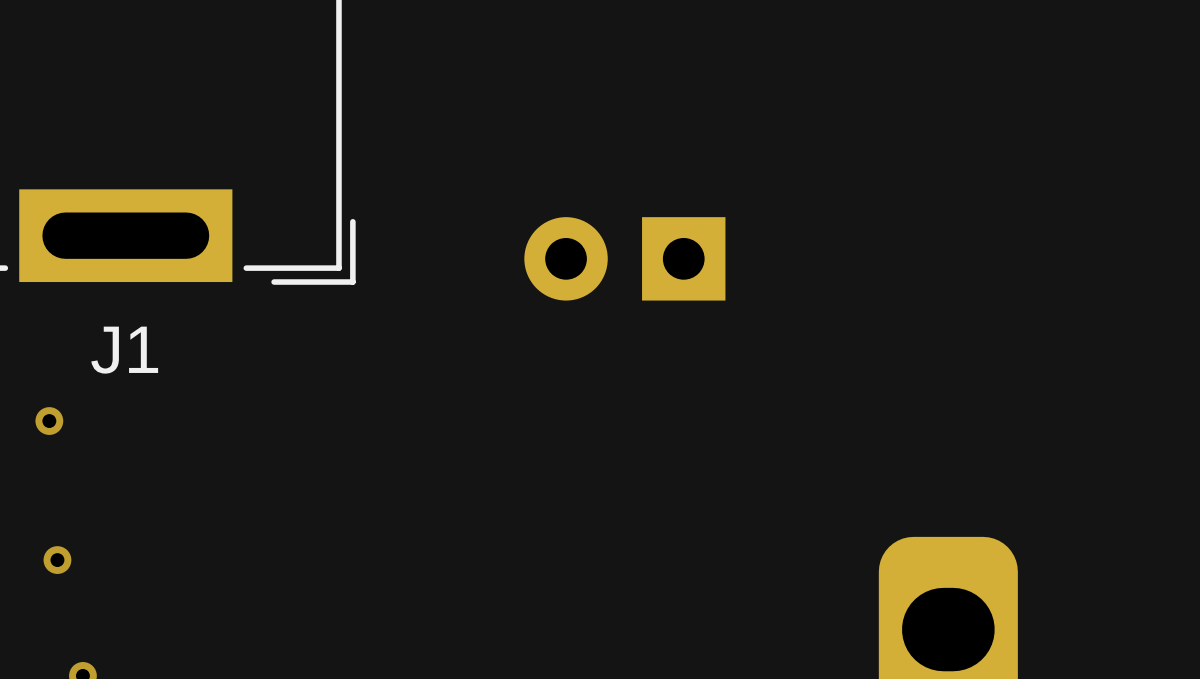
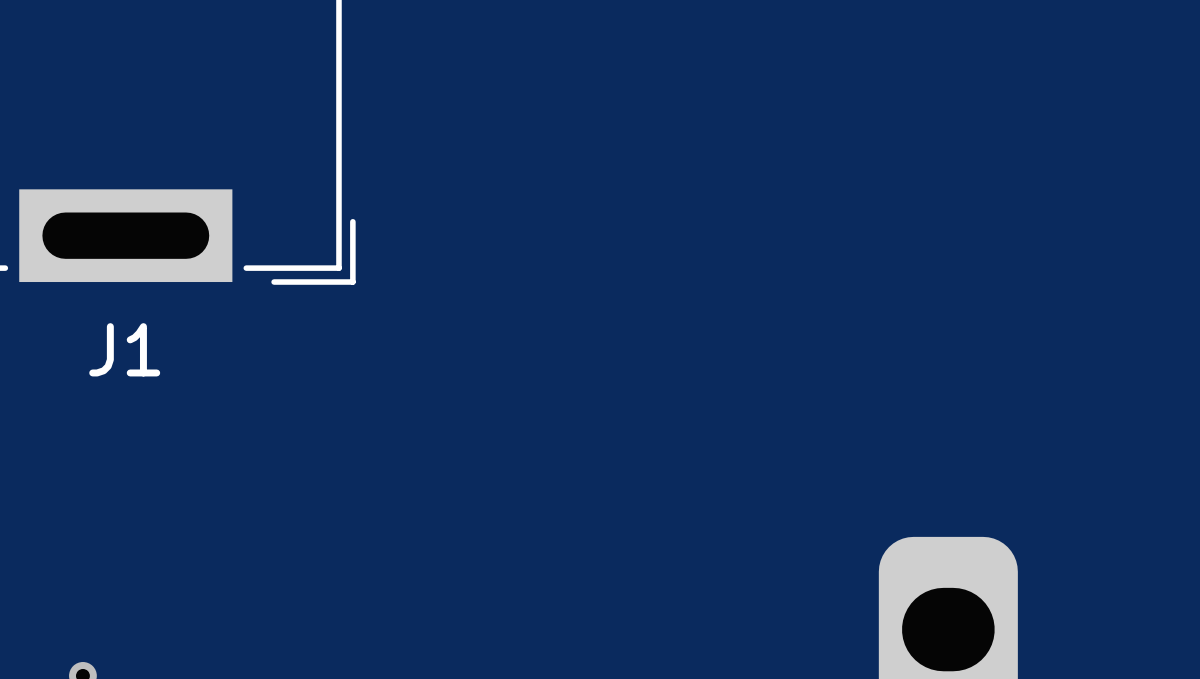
part: (624, 258) -> none
via: (49, 421) -> none
via: (57, 560) -> none

